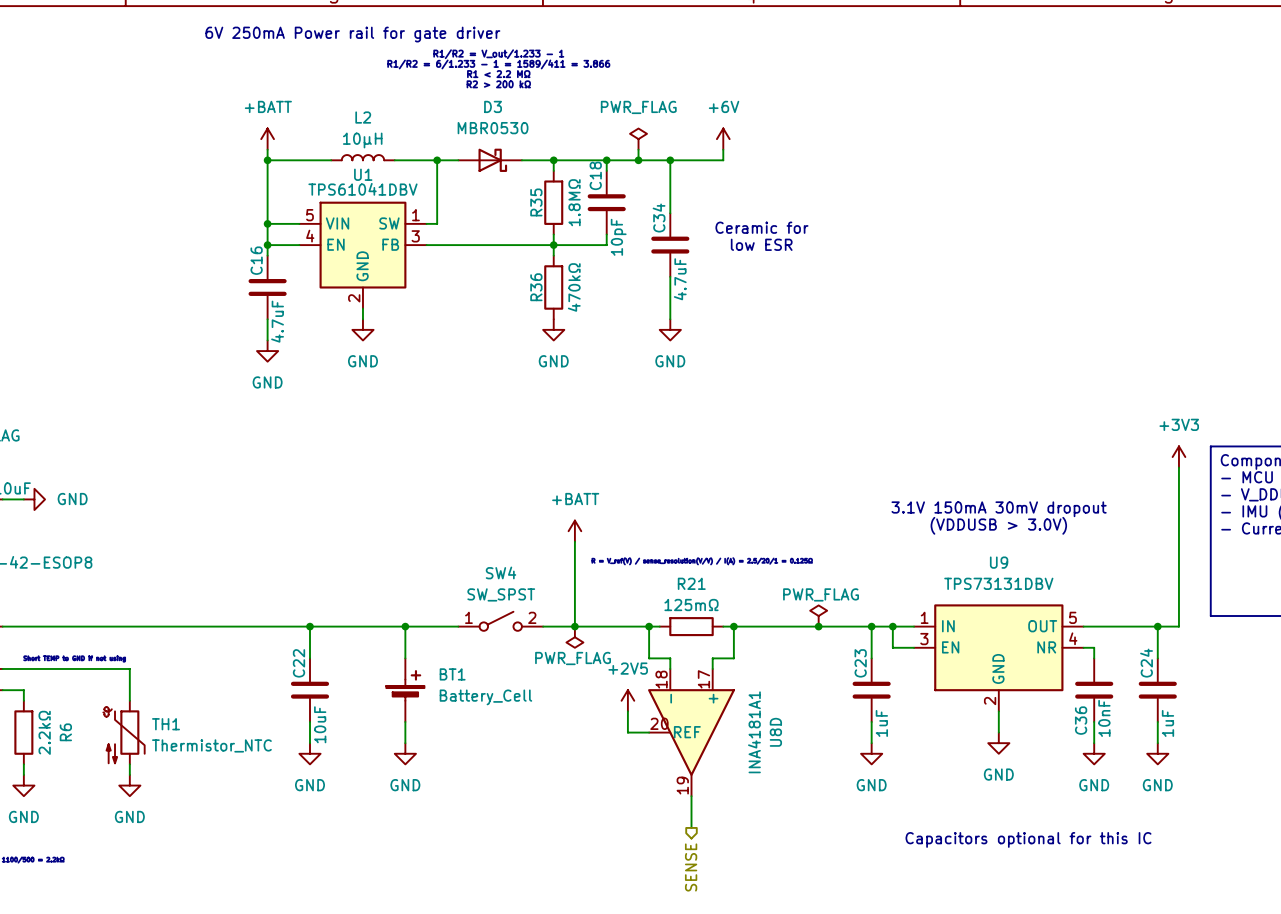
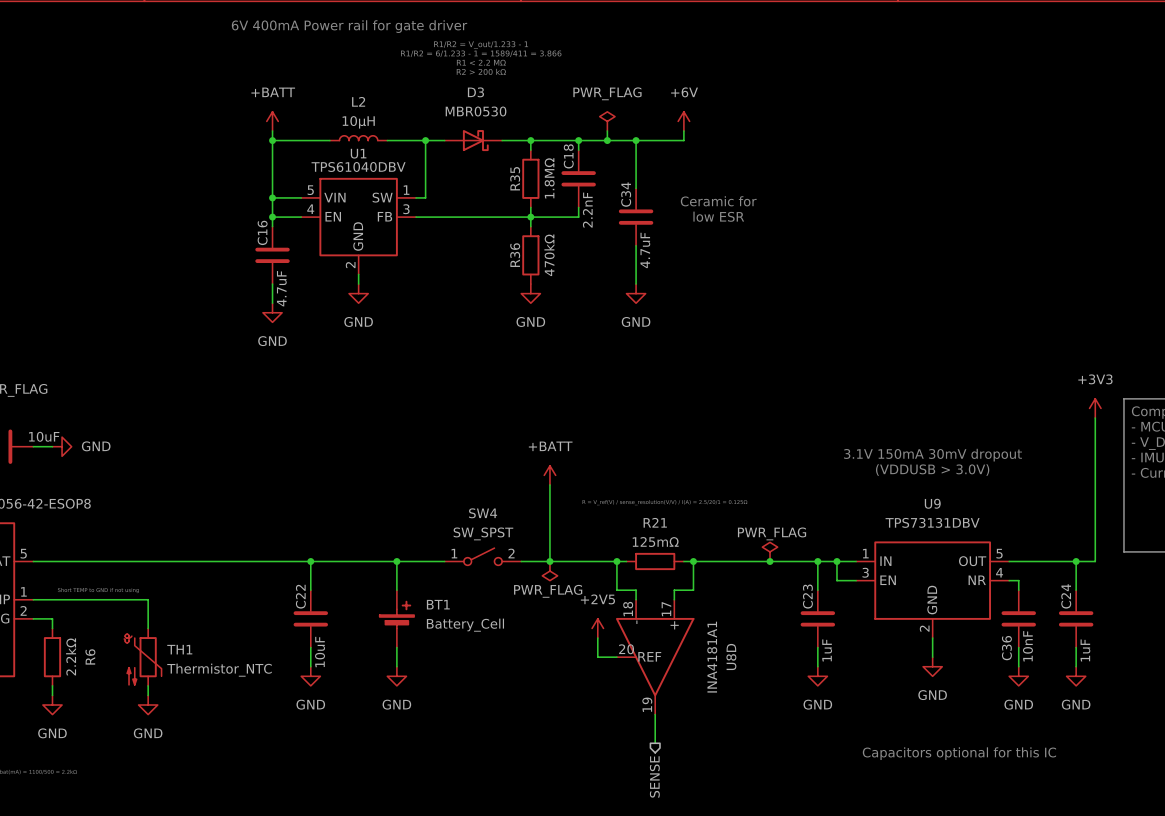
text: 6V 250mA Power rail for gate driver (352, 34) -> 6V 400mA Power rail for gate driver (349, 26)
U1 value: TPS61041DBV (362, 189) -> TPS61040DBV (358, 166)
C18 value: 10pF (618, 237) -> 2.2nF (587, 210)

